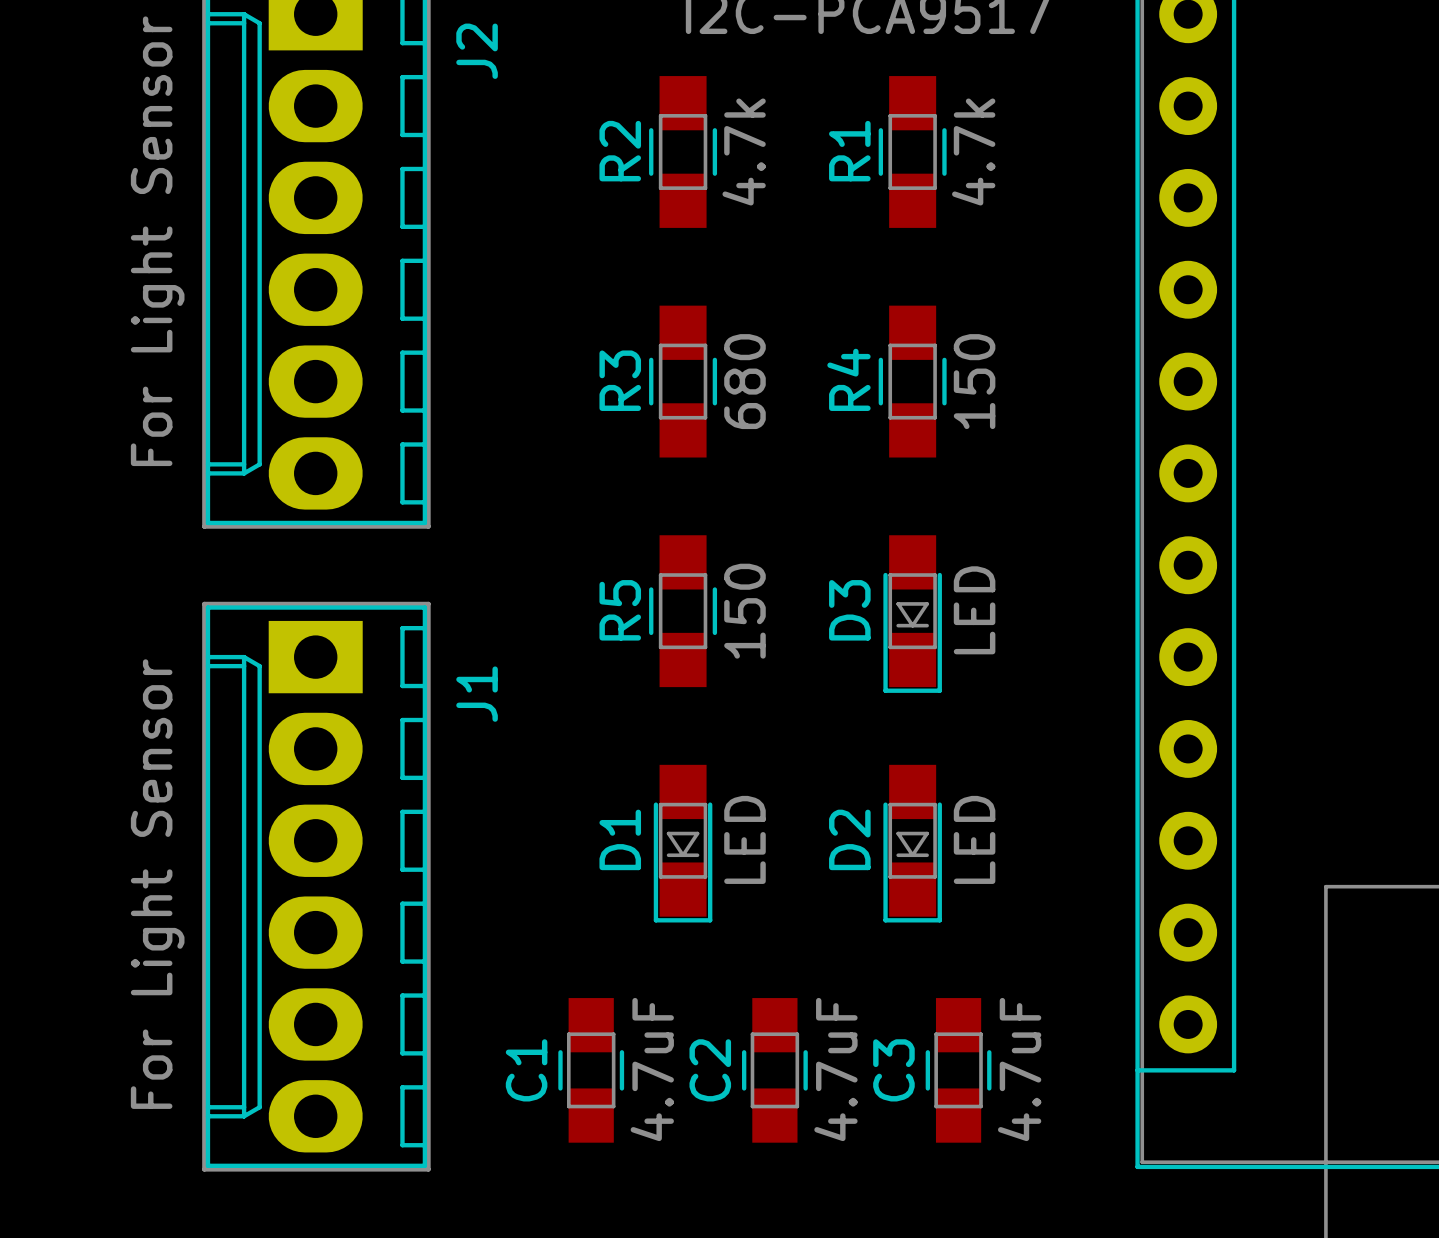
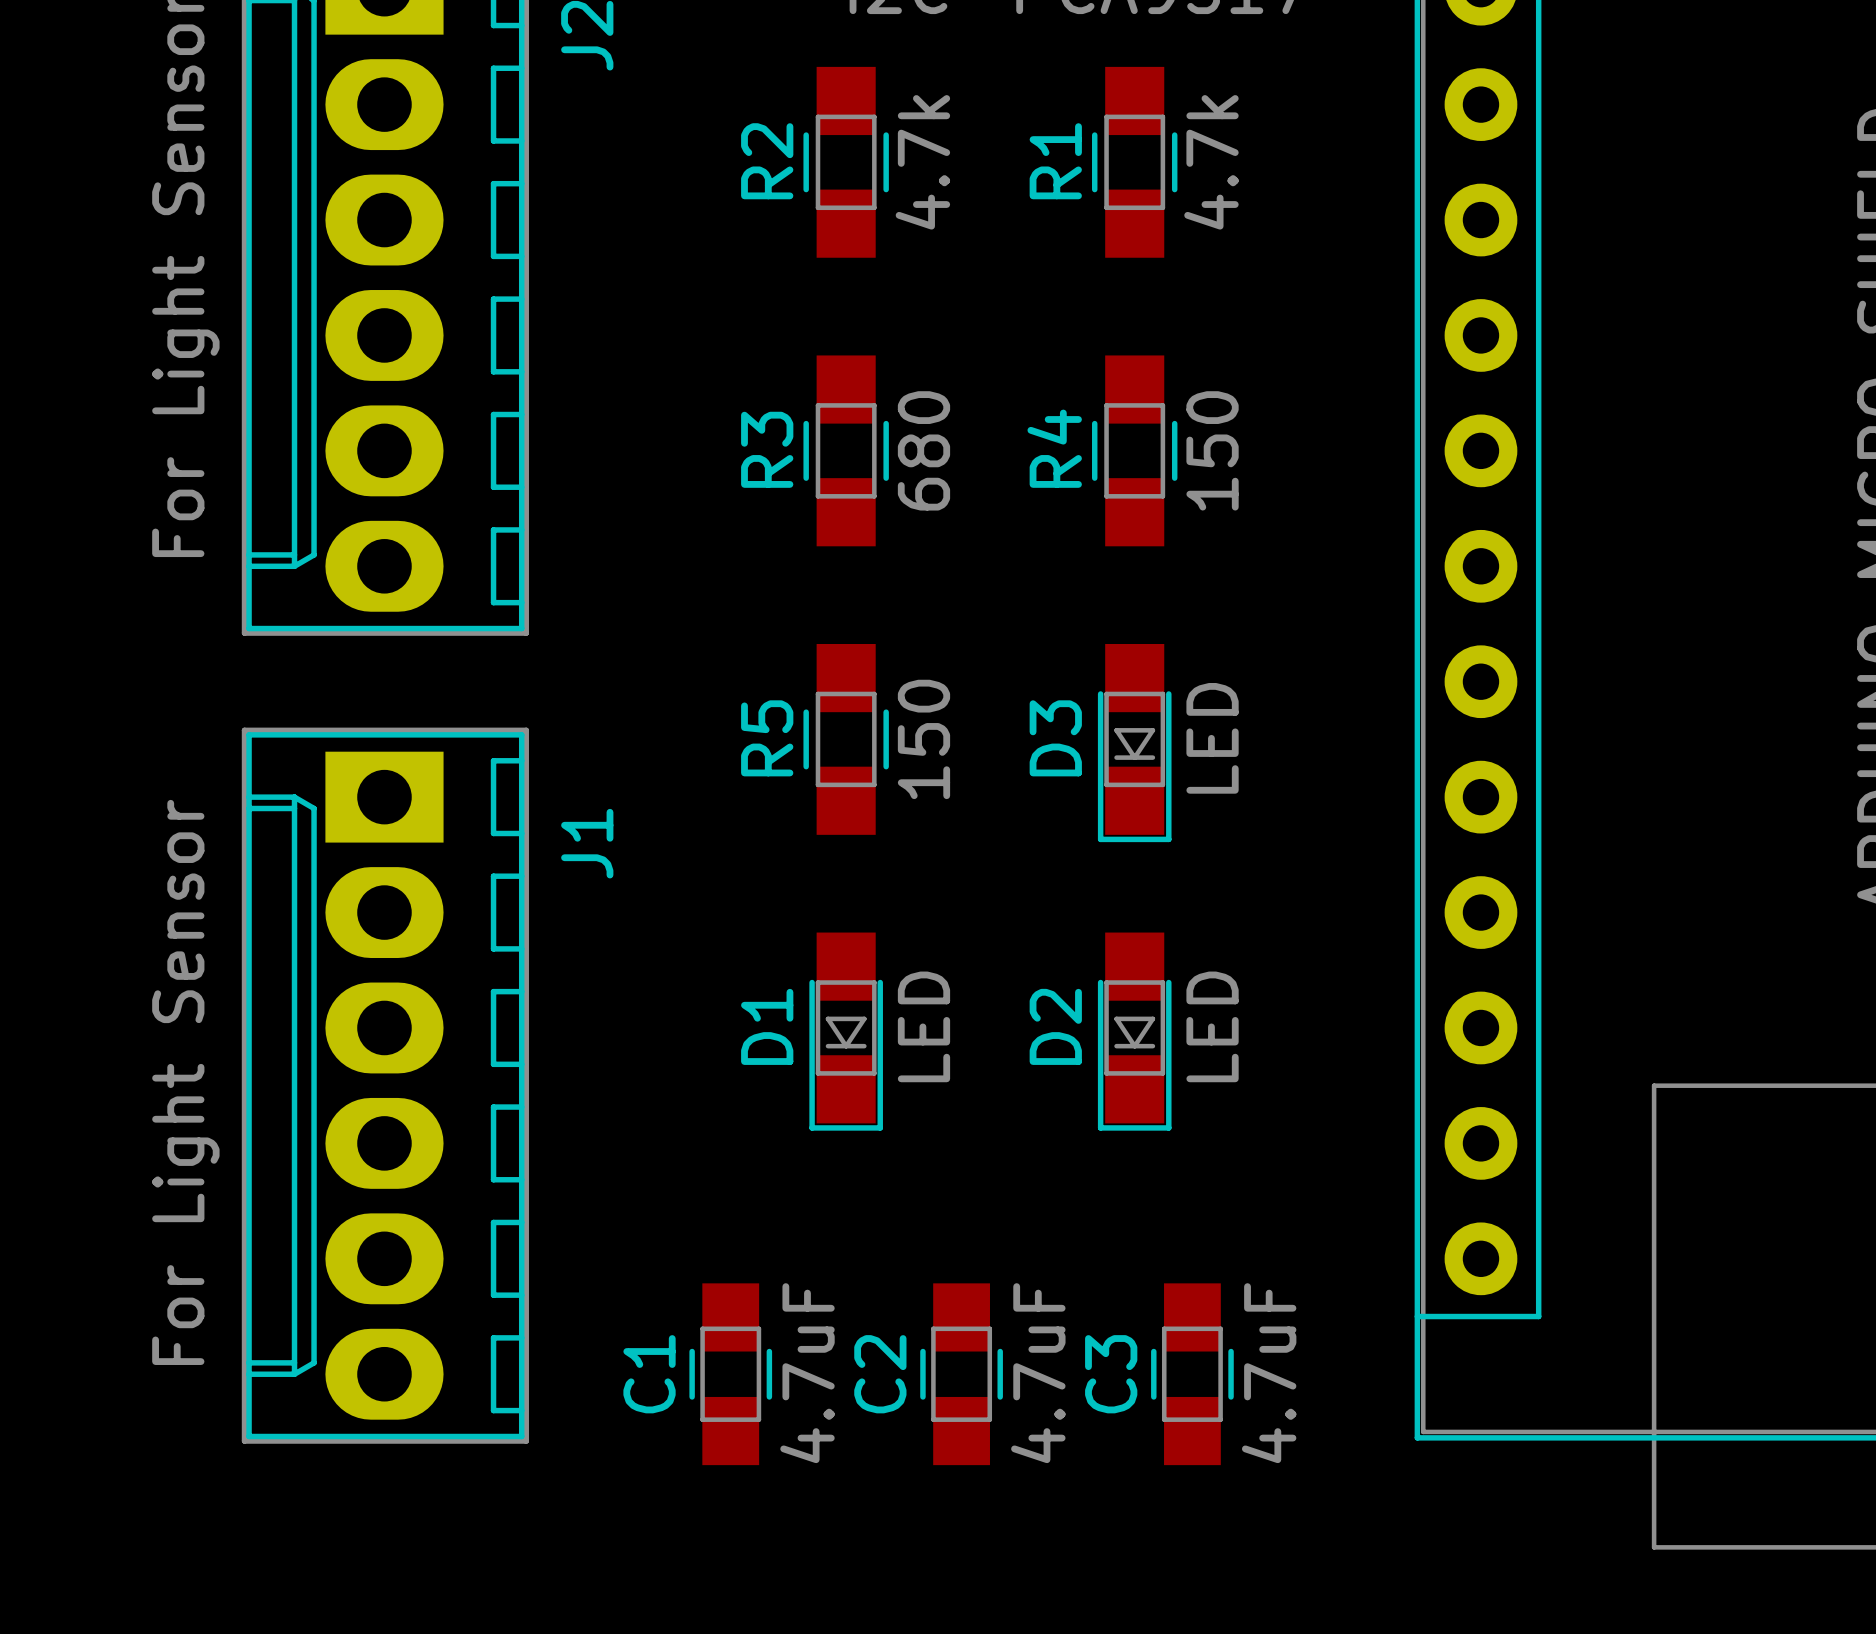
C1 position: (591, 1070) -> (730, 1374)
C2 position: (774, 1070) -> (961, 1374)
C3 position: (958, 1070) -> (1192, 1374)

